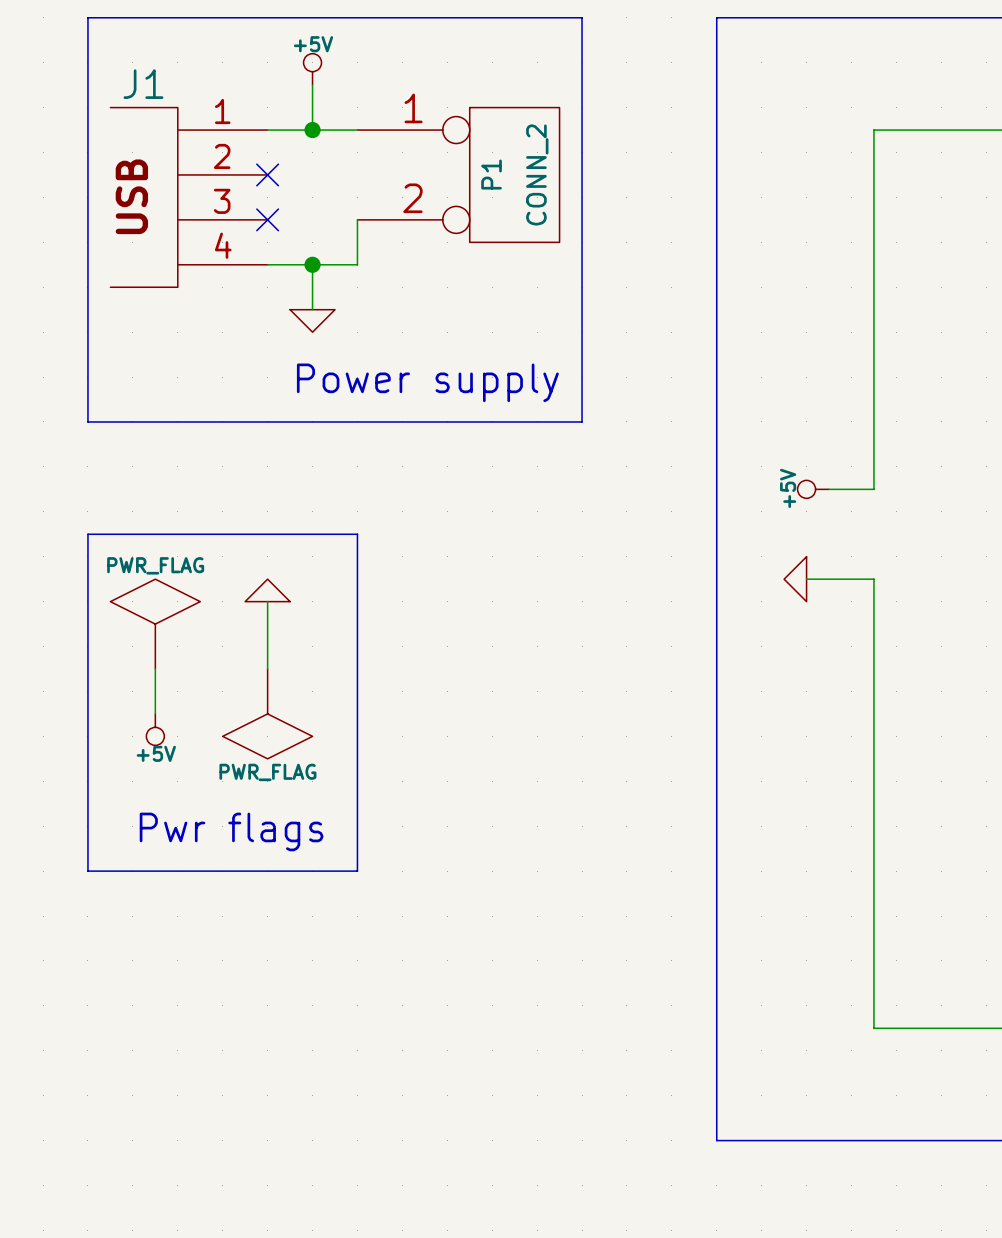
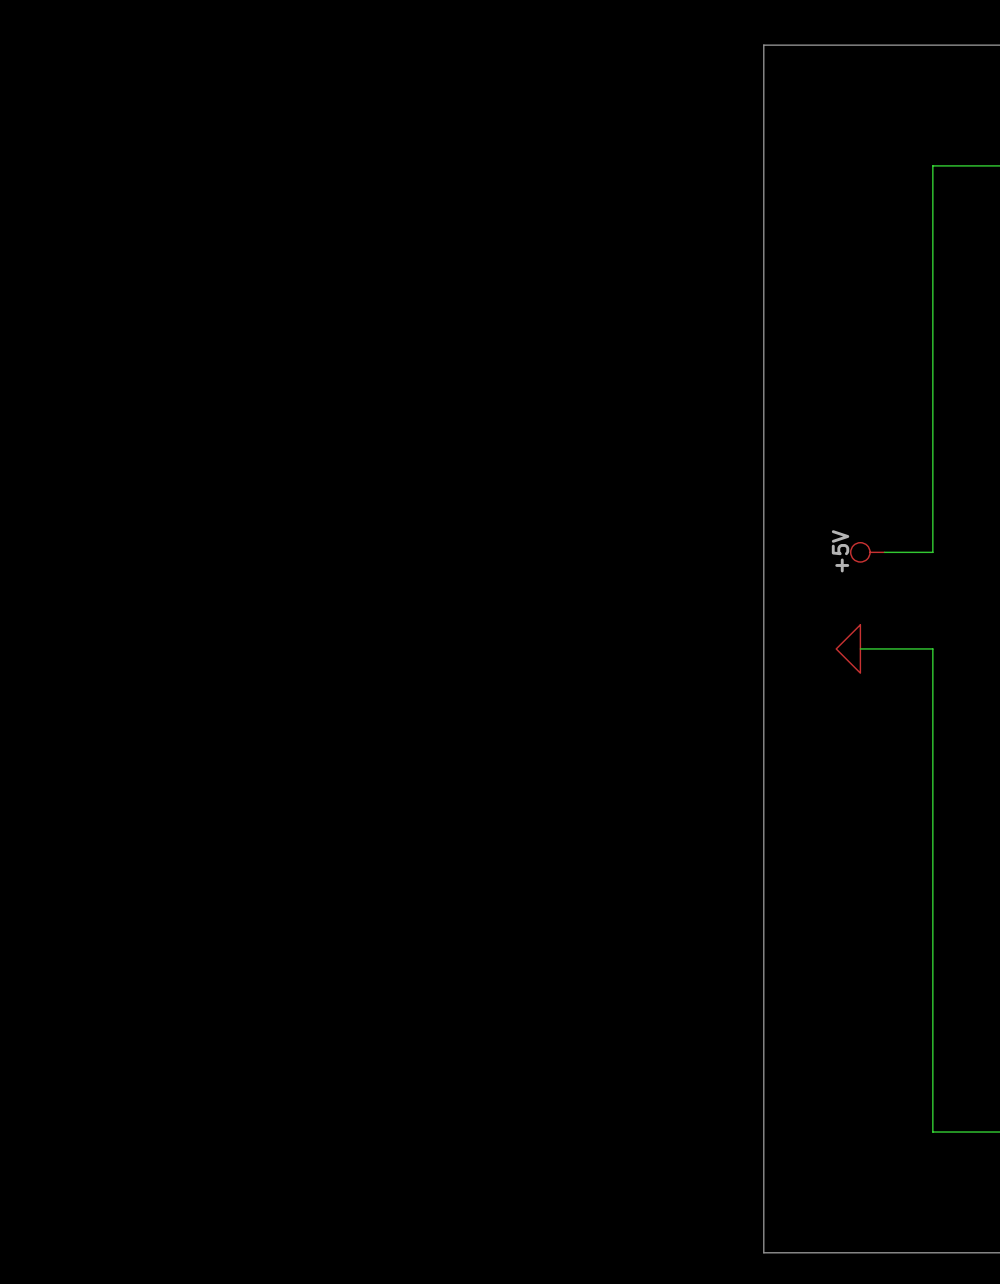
bus: (87, 17) (87, 421) (582, 421) (582, 17) (87, 17) -> none
power symbol: +5V (312, 69) -> none
wire: (312, 85) (312, 130) -> none
wire: (267, 130) (357, 130) -> none
junction: (312, 130) -> none
no-connect mark: (267, 174) -> none
P1: CONN_2 (458, 174) -> none
J1: (189, 197) -> none
no-connect mark: (267, 219) -> none
wire: (357, 219) (357, 264) (267, 264) -> none
wire: (312, 264) (312, 309) -> none
junction: (312, 264) -> none
power symbol: (312, 320) -> none
text: Power supply (427, 382) -> none
bus: (87, 534) (87, 871) (357, 871) (357, 534) (87, 534) -> none
power symbol: (267, 590) -> none
wire: (267, 601) (267, 669) -> none
power symbol: PWR_FLAG (155, 624) -> none
wire: (155, 669) (155, 713) -> none
power symbol: PWR_FLAG (267, 713) -> none
power symbol: +5V (155, 729) -> none
text: Pwr flags (231, 831) -> none

